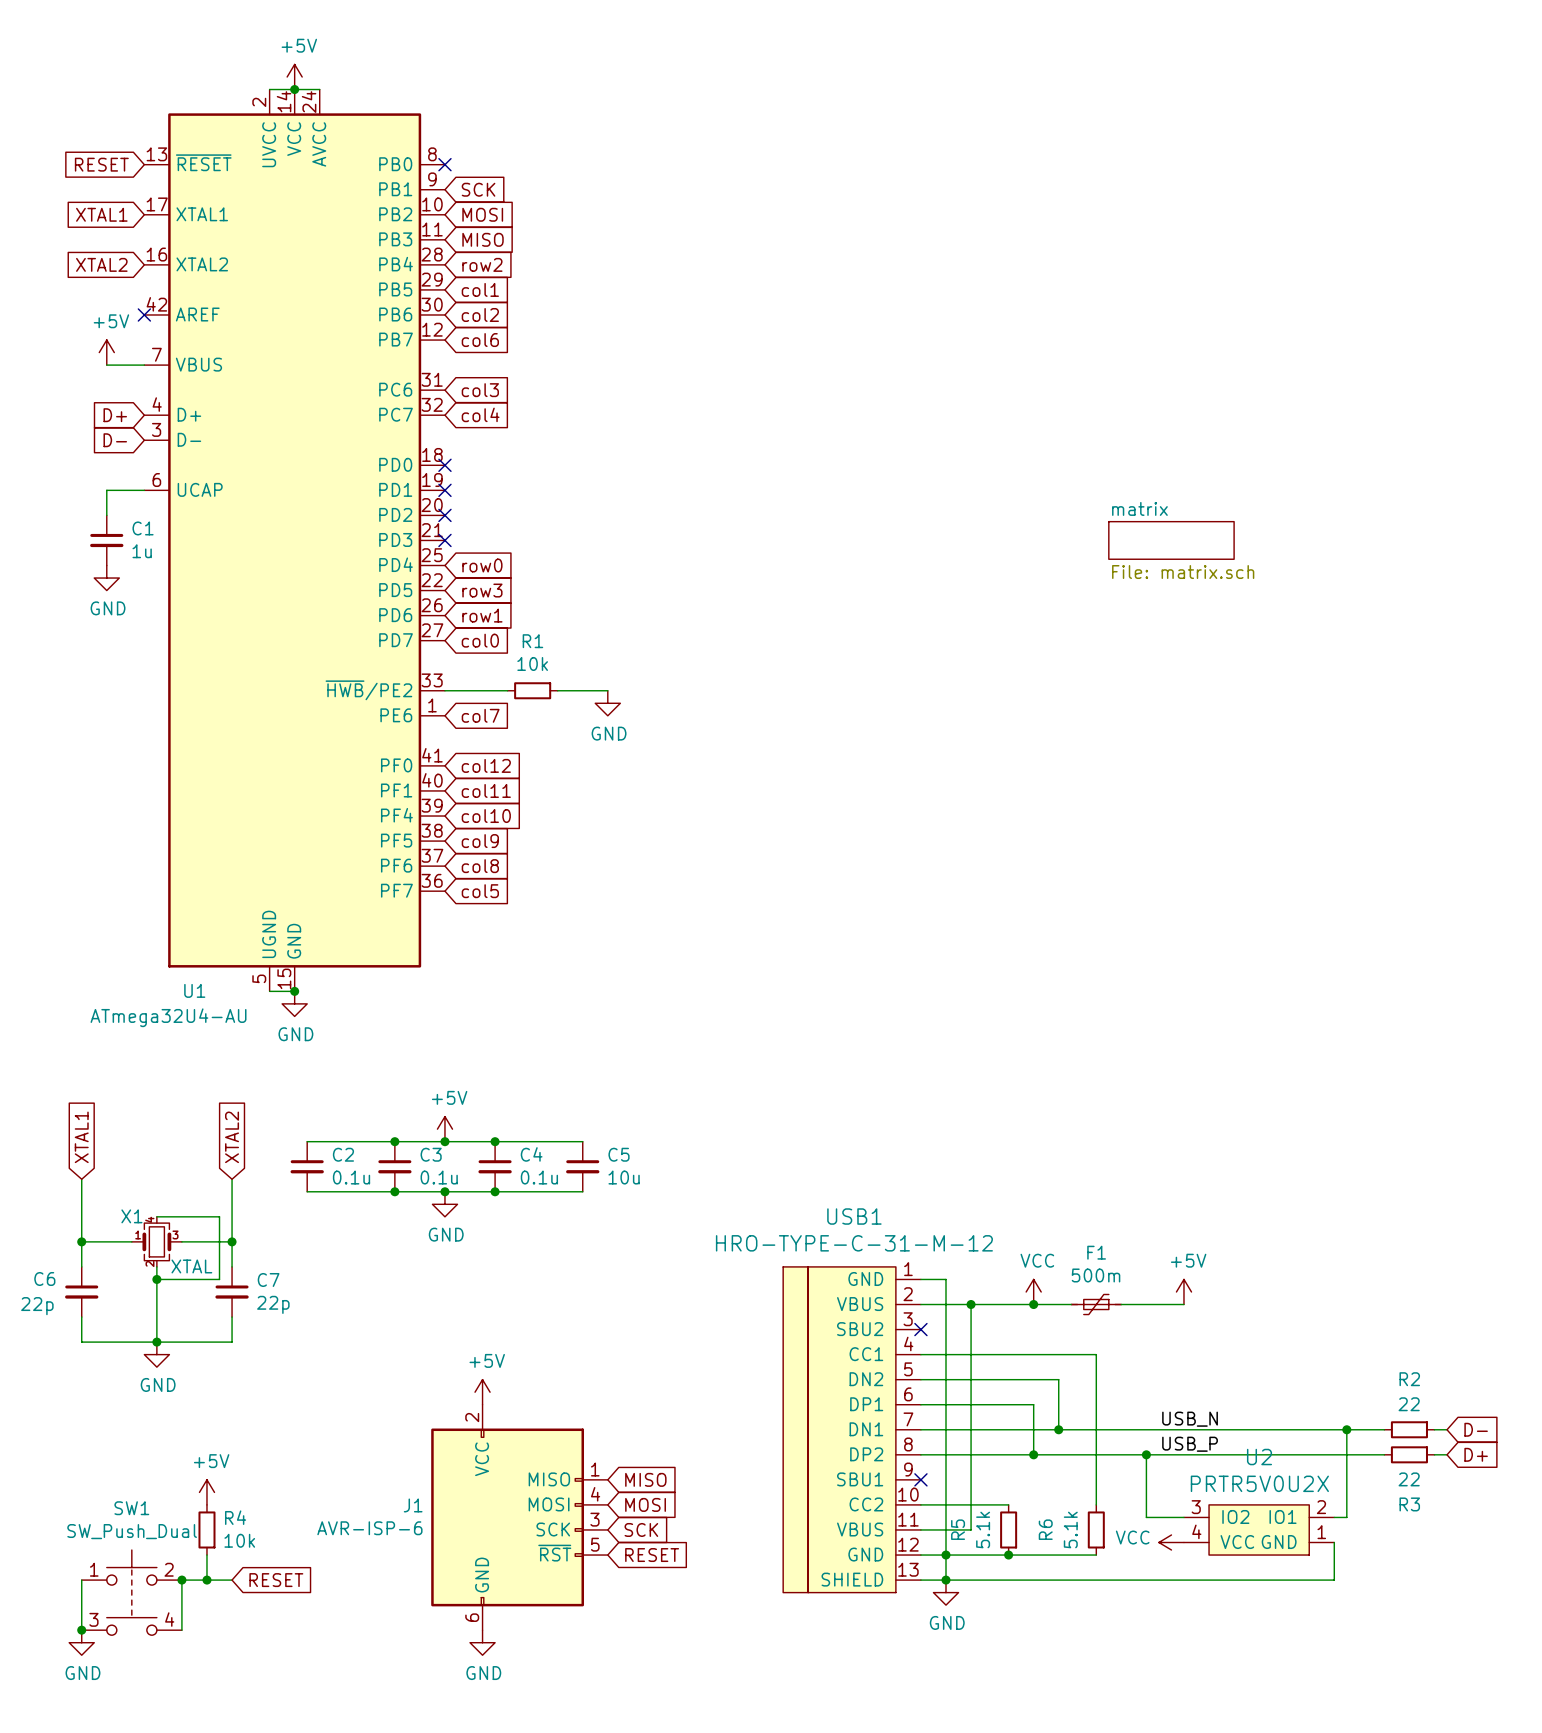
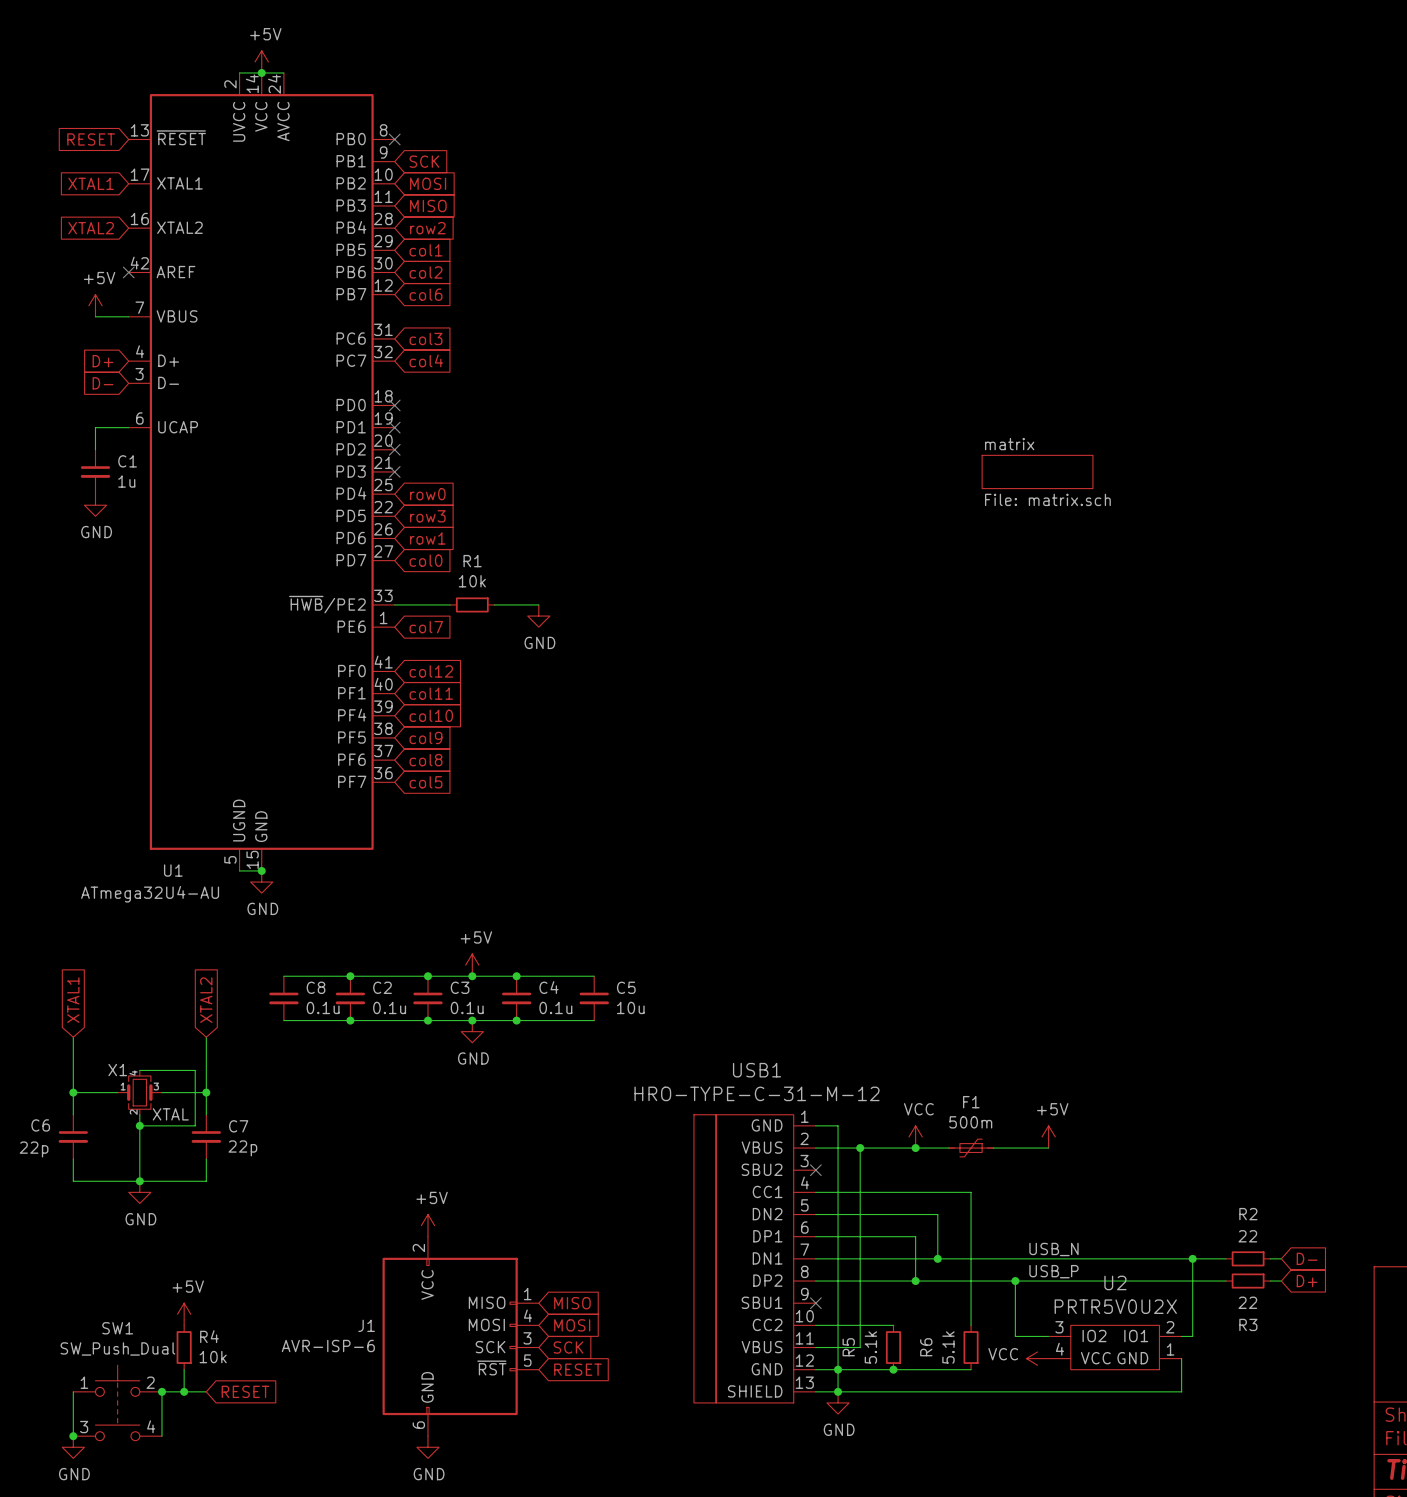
wire: none -> (283, 976) (594, 976)
junction: none -> (350, 976)
junction: none -> (427, 976)
junction: none -> (472, 976)
junction: none -> (516, 976)
power symbol position: +5V (444, 1129) -> +5V (472, 965)
C8: none -> 0.1u (283, 998)
wire: (307, 1141) (582, 1141) -> none
junction: (394, 1141) -> none
junction: (444, 1141) -> none
junction: (495, 1141) -> none
wire: none -> (283, 1020) (594, 1020)
junction: none -> (350, 1020)
junction: none -> (427, 1020)
junction: none -> (472, 1020)
junction: none -> (516, 1020)
C2 position: (307, 1166) -> (350, 998)
C3 position: (394, 1166) -> (427, 998)
C4 position: (495, 1166) -> (516, 998)
C5 position: (582, 1166) -> (594, 998)
wire: (307, 1191) (582, 1191) -> none
junction: (394, 1191) -> none
junction: (444, 1191) -> none
junction: (495, 1191) -> none
power symbol position: GND (444, 1204) -> GND (472, 1031)

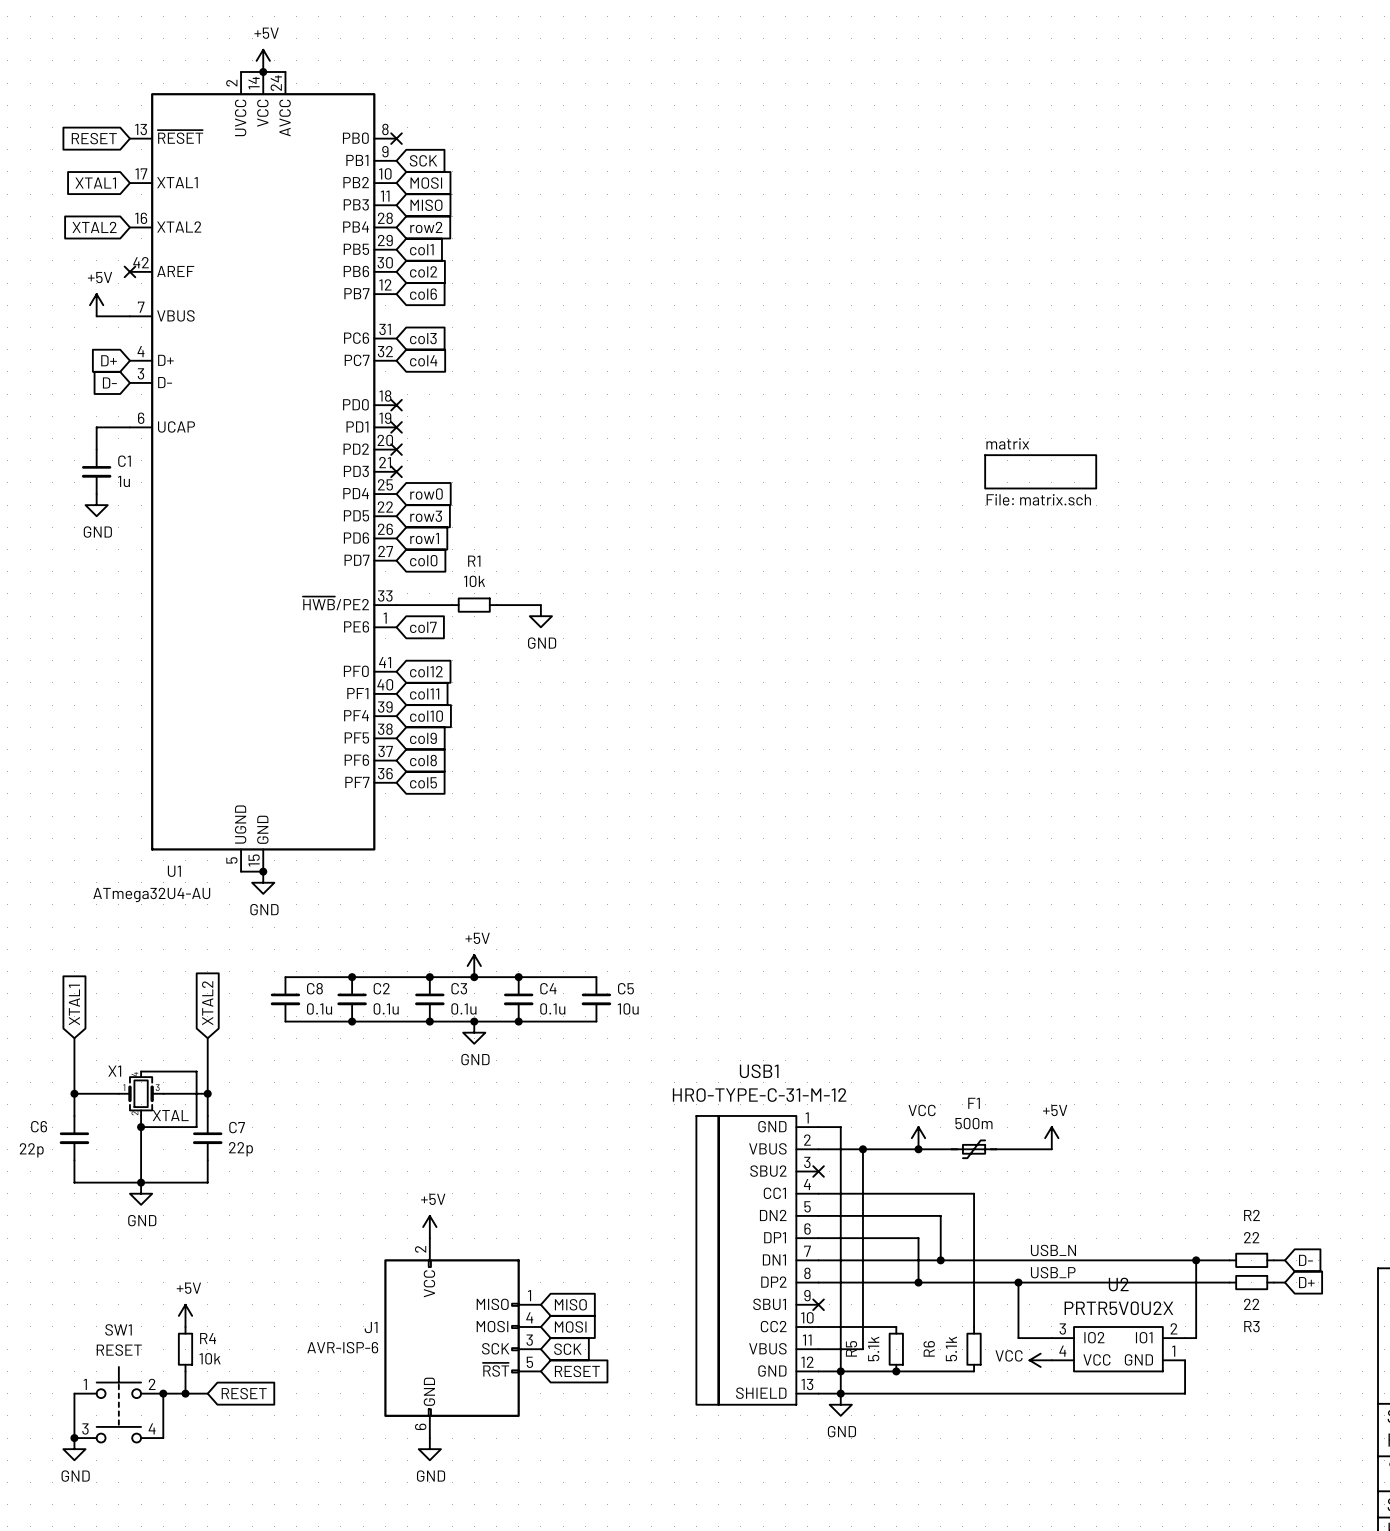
SW1 value: SW_Push_Dual (117, 1348) -> RESET (119, 1350)

